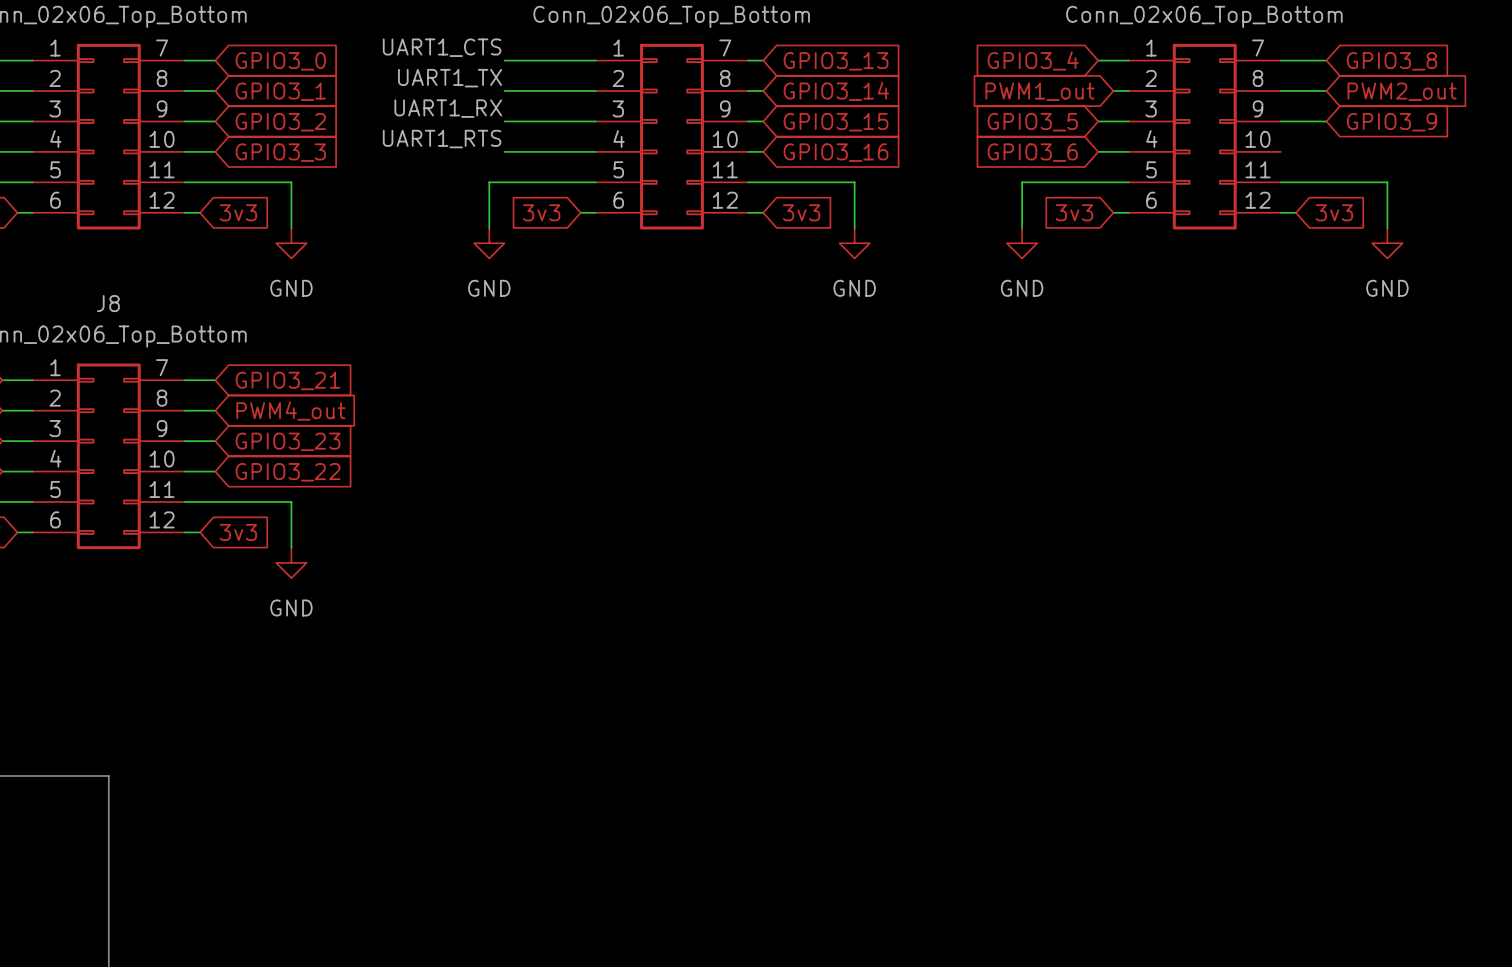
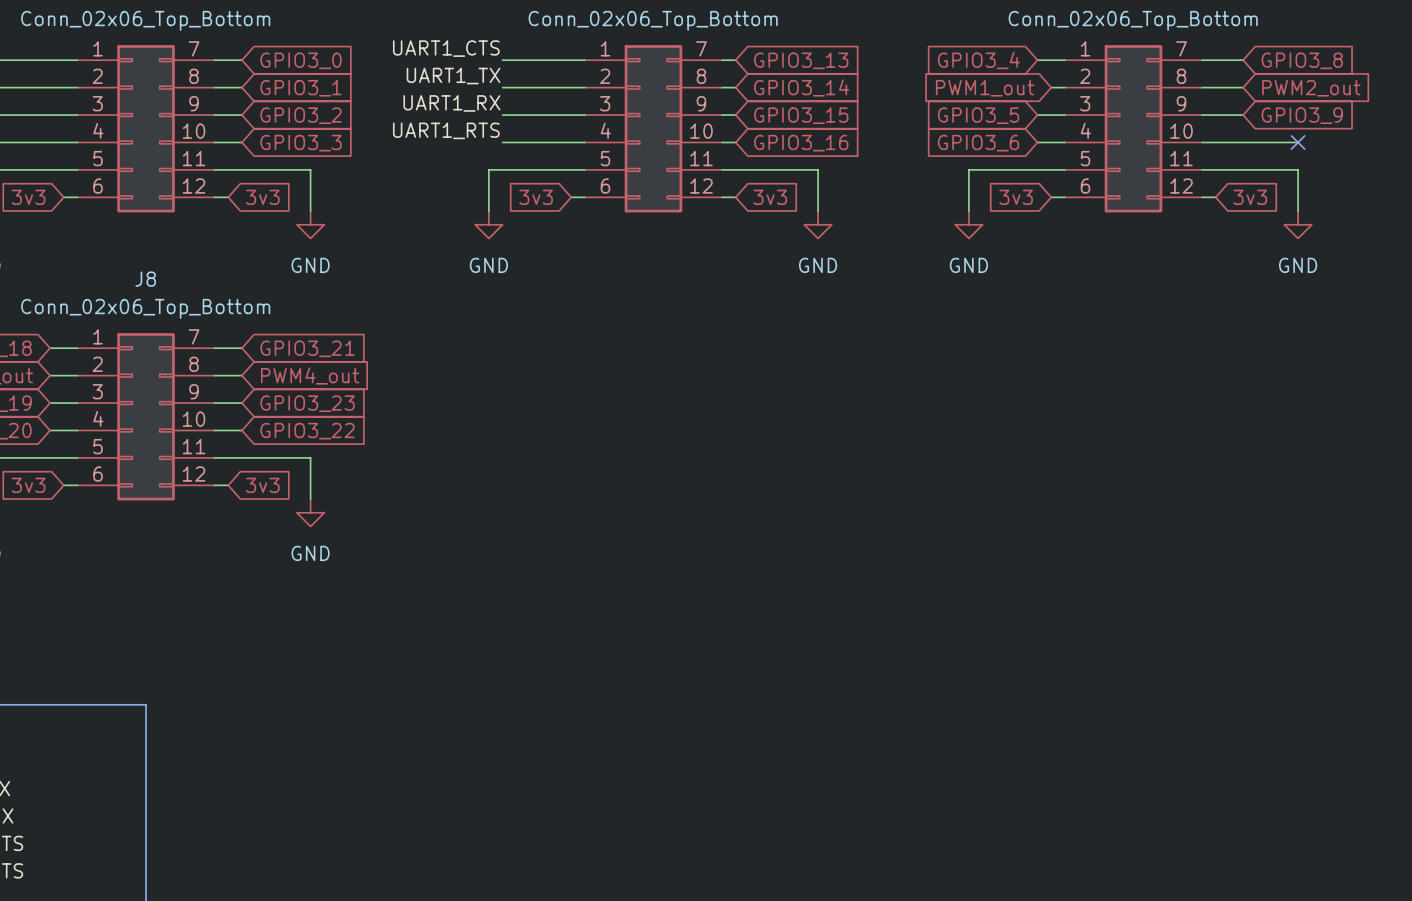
wire: none -> (1202, 142) (1298, 142)
no-connect mark: none -> (1298, 142)

